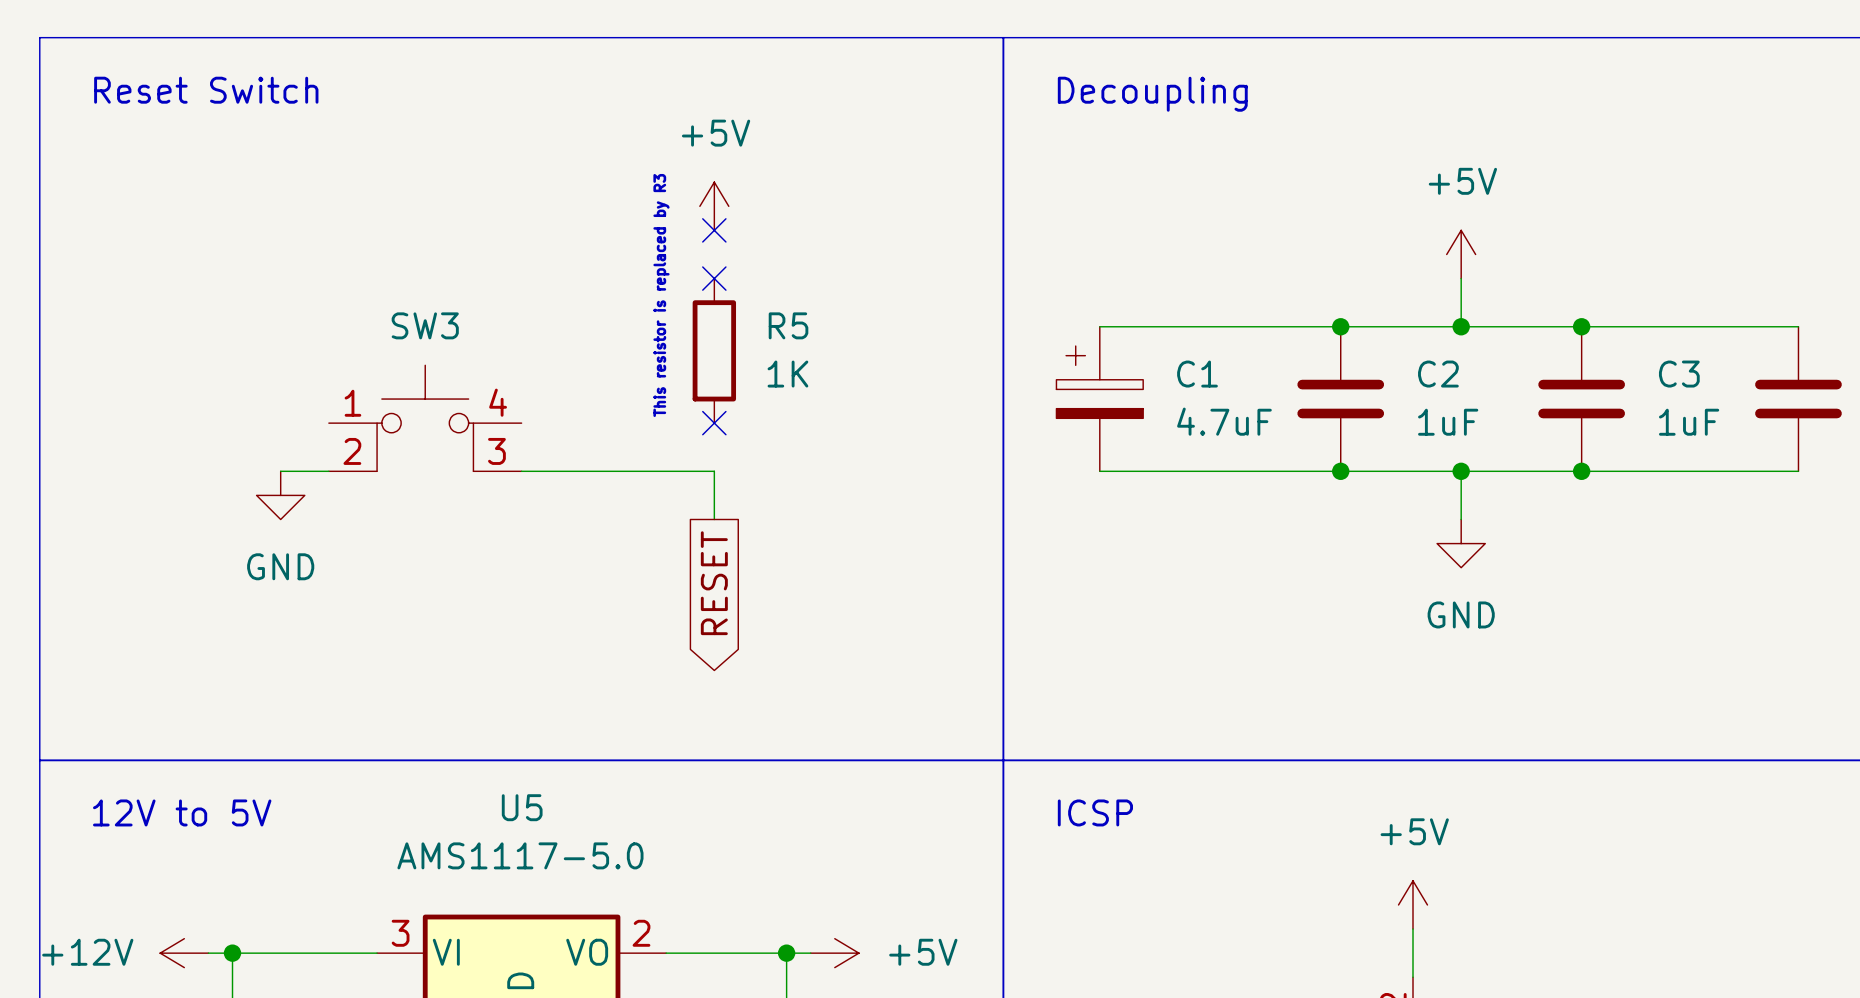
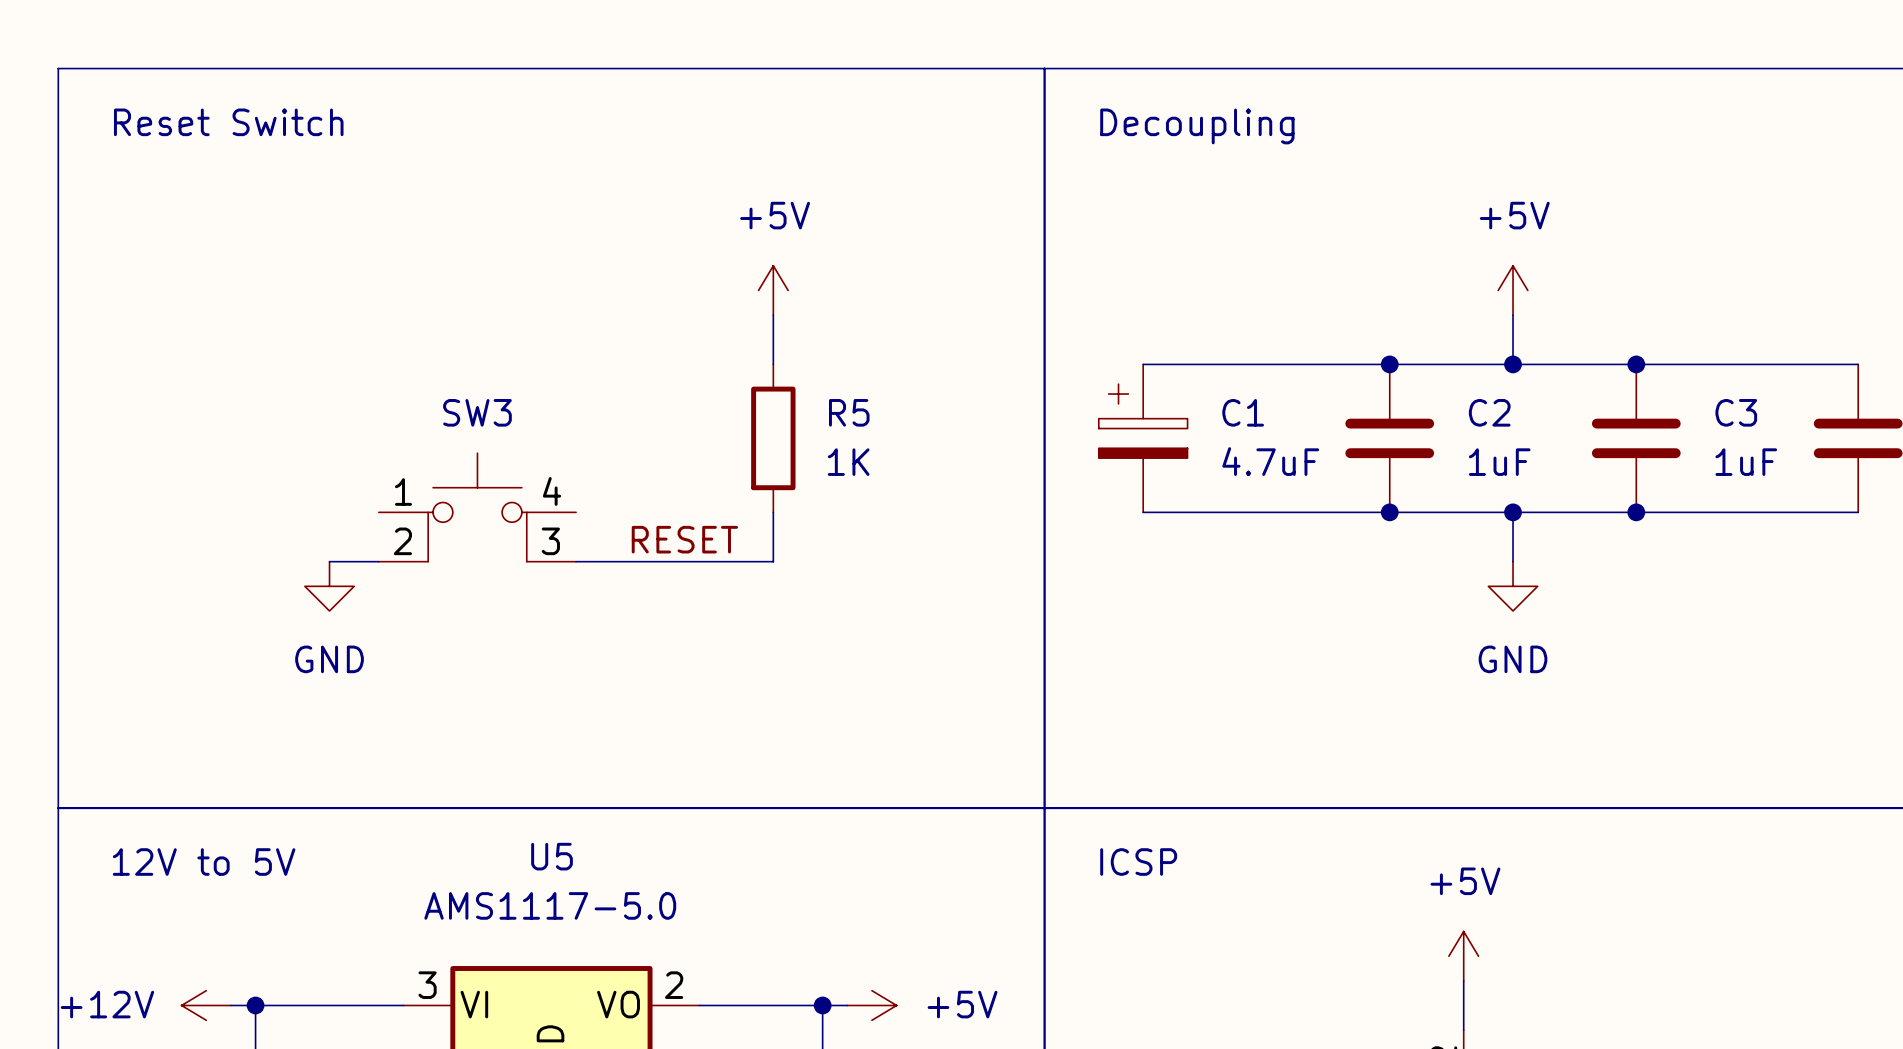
power symbol position: +5V (714, 206) -> +5V (773, 290)
no-connect mark: (714, 230) -> none
no-connect mark: (714, 278) -> none
wire: none -> (773, 315) (773, 364)
text: This resistor is replaced by R3 (661, 295) -> none
R5 position: (714, 350) -> (773, 438)
SW3 position: (425, 418) -> (477, 507)
no-connect mark: (714, 423) -> none
wire: (280, 471) (328, 471) -> (329, 561) (378, 561)
wire: (521, 471) (714, 471) (714, 519) -> none
wire: none -> (773, 512) (773, 561) (576, 561)
power symbol position: GND (280, 495) -> GND (329, 586)
label: none -> RESET (684, 539)
global label: RESET (714, 583) -> none

